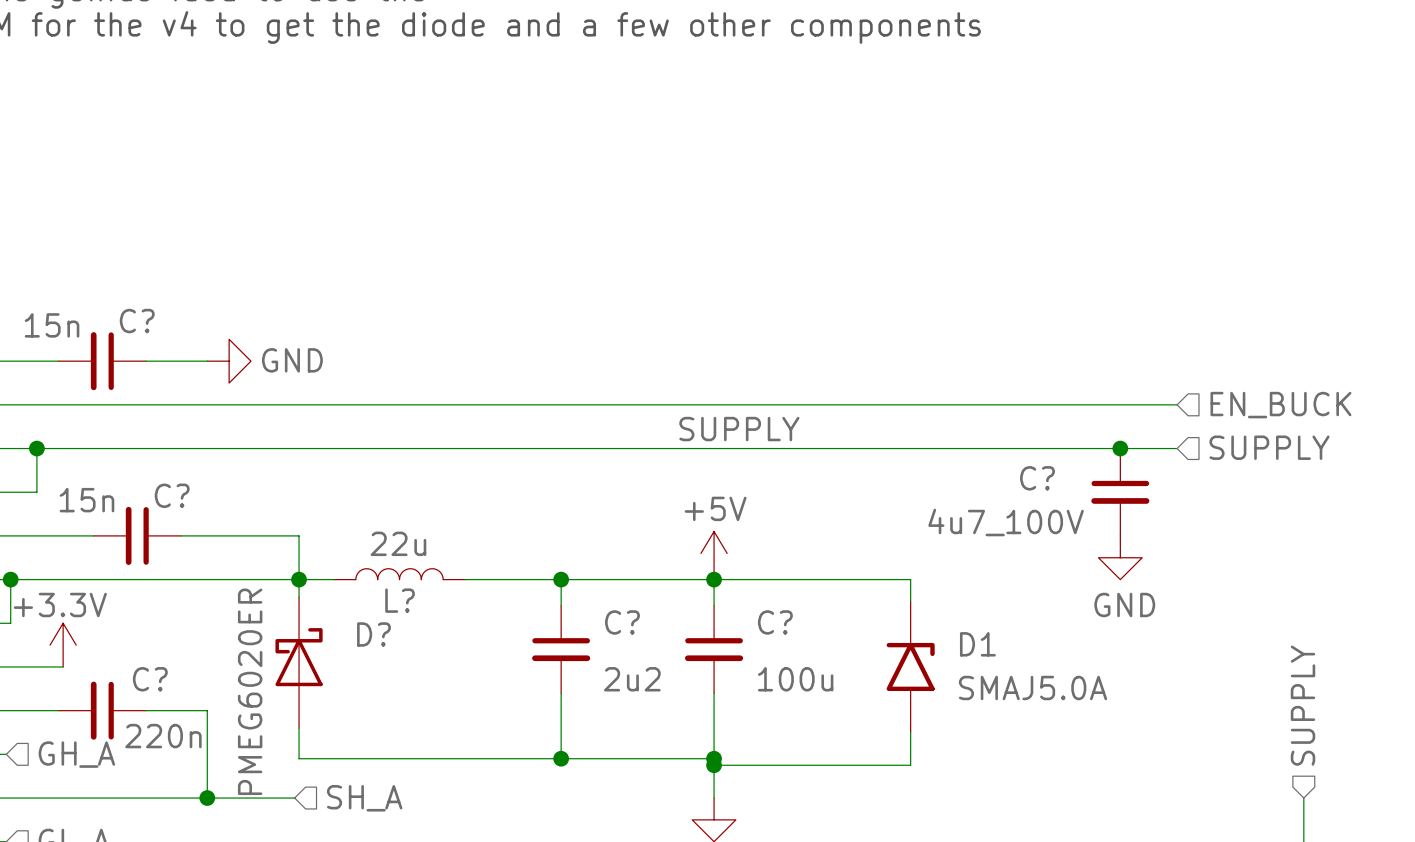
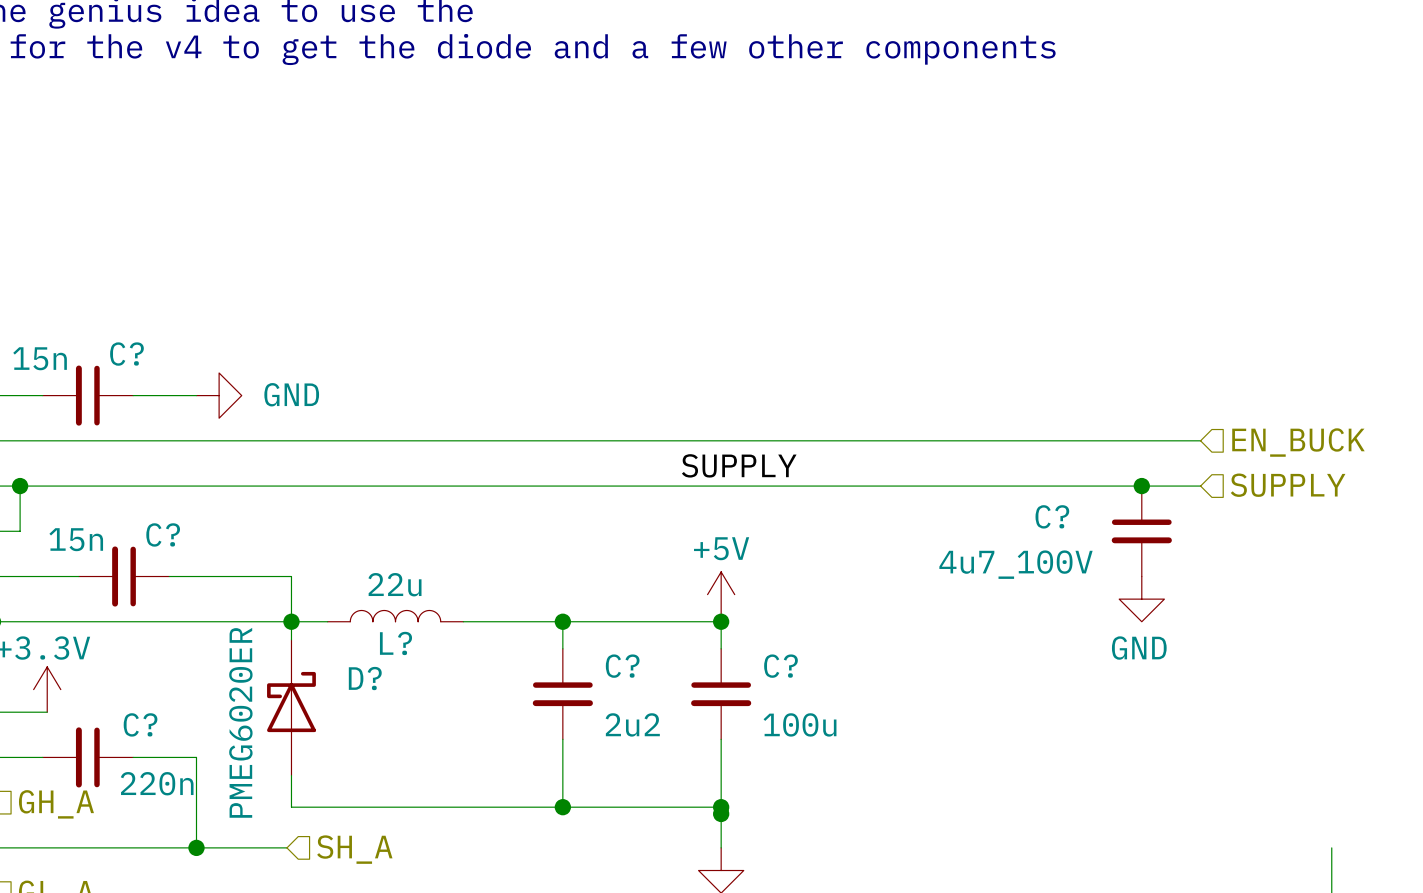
wire: (714, 579) (910, 579) (910, 601) -> none
D1: SMAJ5.0A (910, 666) -> none
hierarchical label: SUPPLY (1303, 705) -> none
wire: (910, 732) (910, 765) (714, 765) -> none

